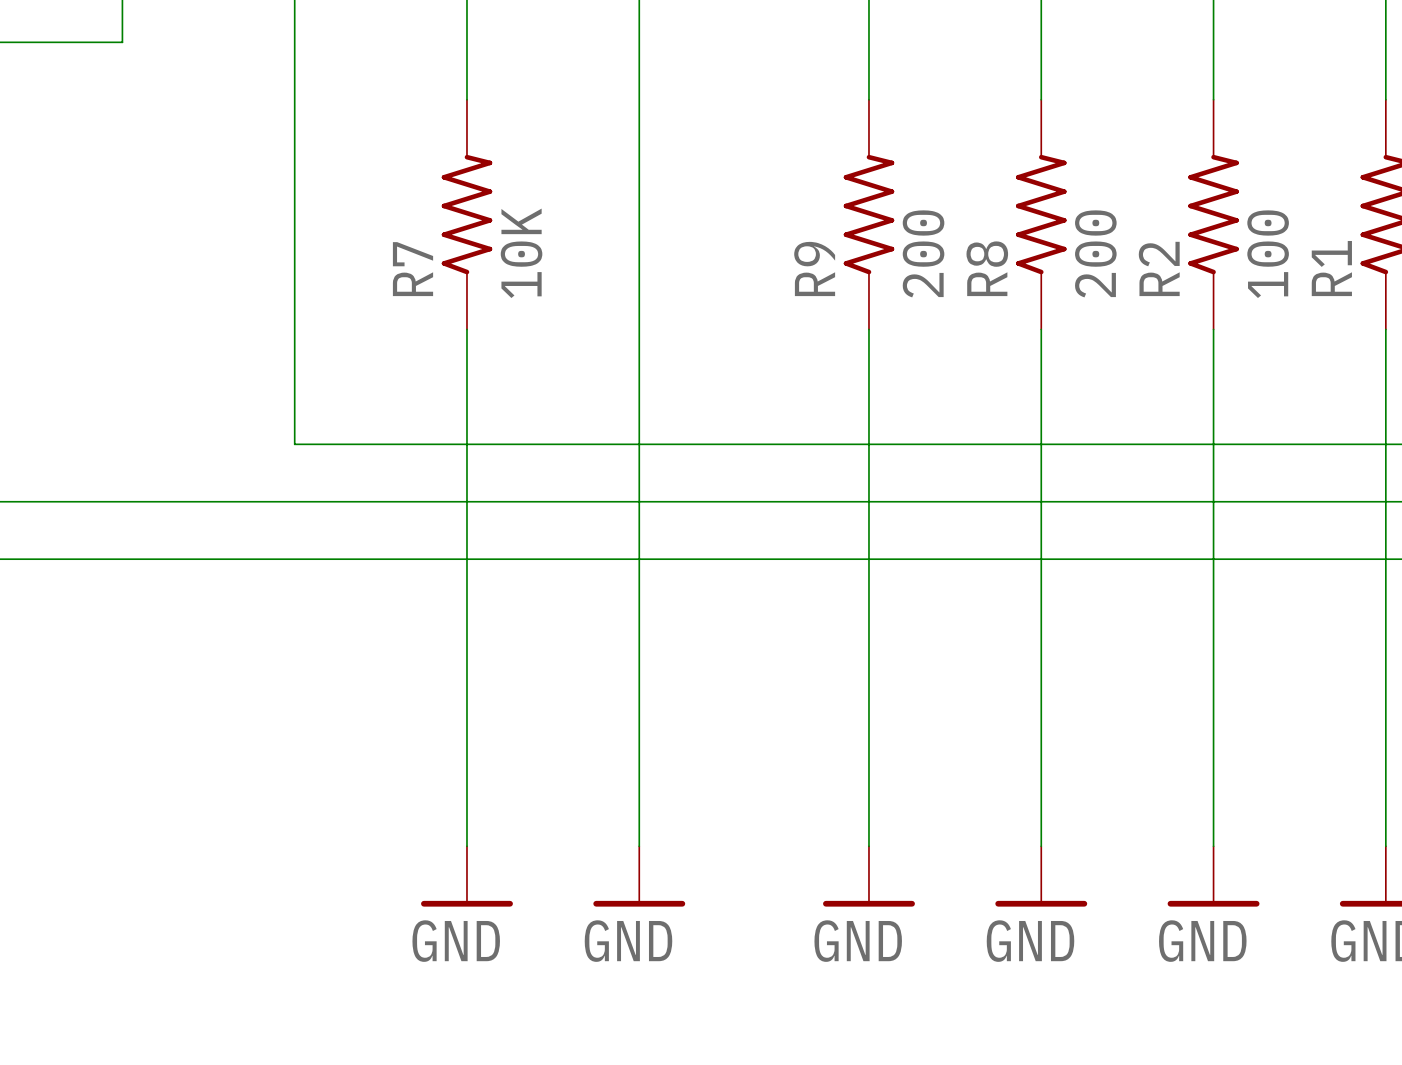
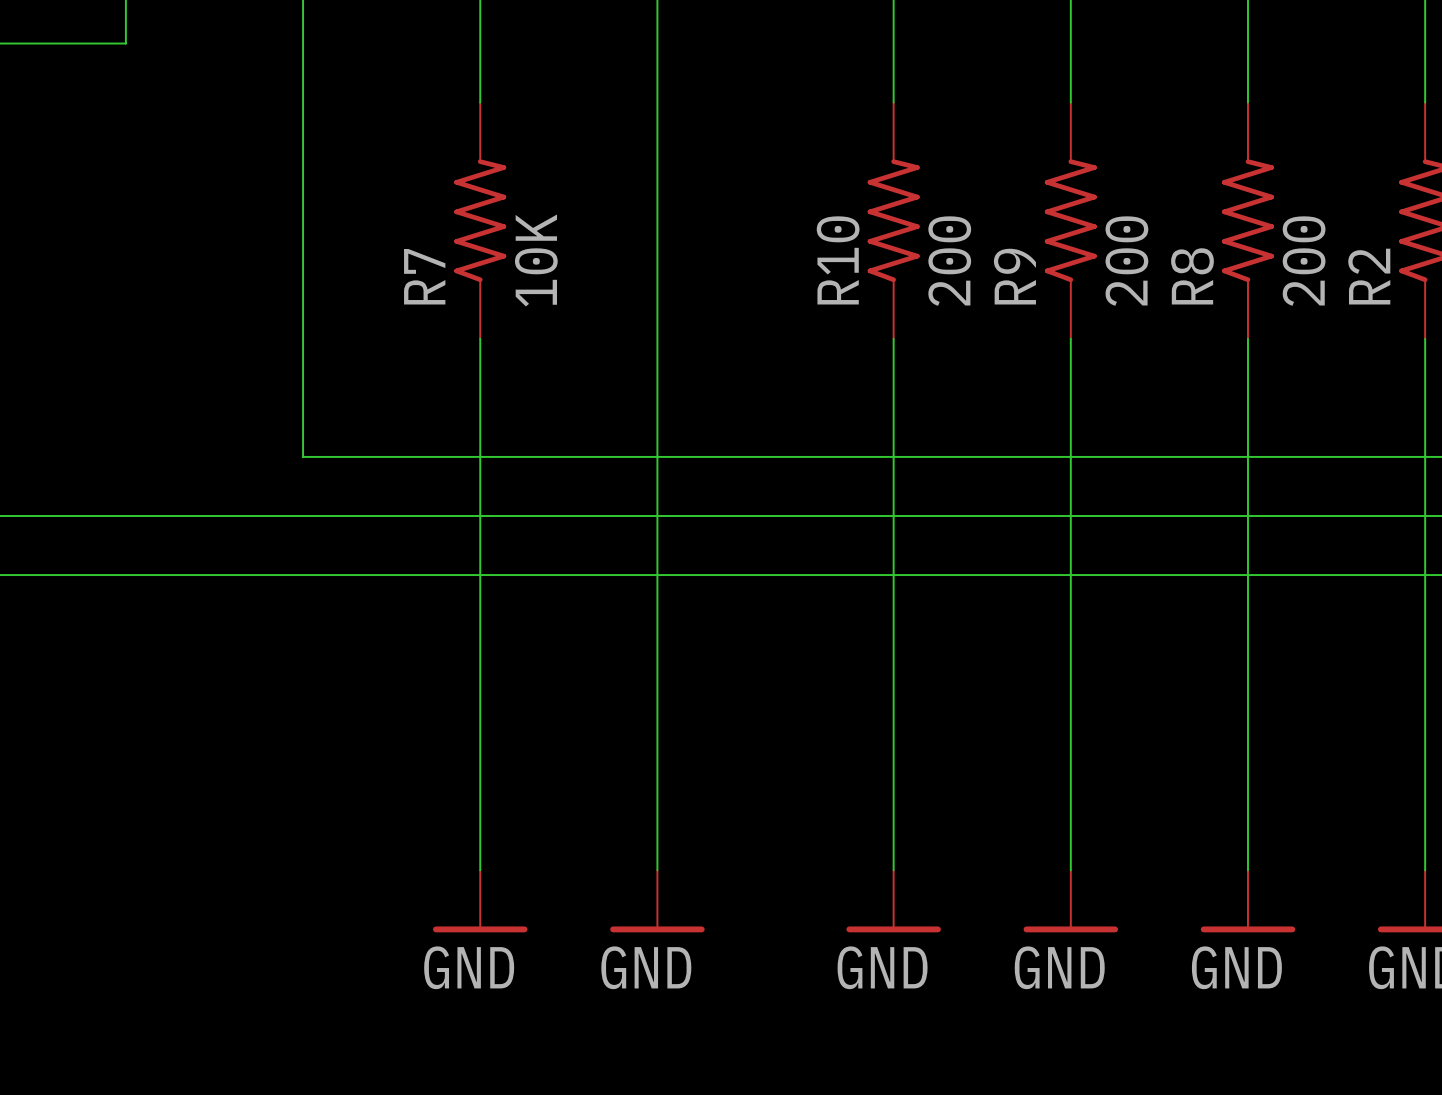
R2 value: 100 (1268, 254) -> 200 (1304, 261)
R9 name: R9 (814, 268) -> R10 (838, 260)
R8 name: R8 (987, 268) -> R9 (1014, 276)
R2 name: R2 (1159, 268) -> R8 (1192, 276)
R1 name: R1 (1331, 268) -> R2 (1369, 276)

